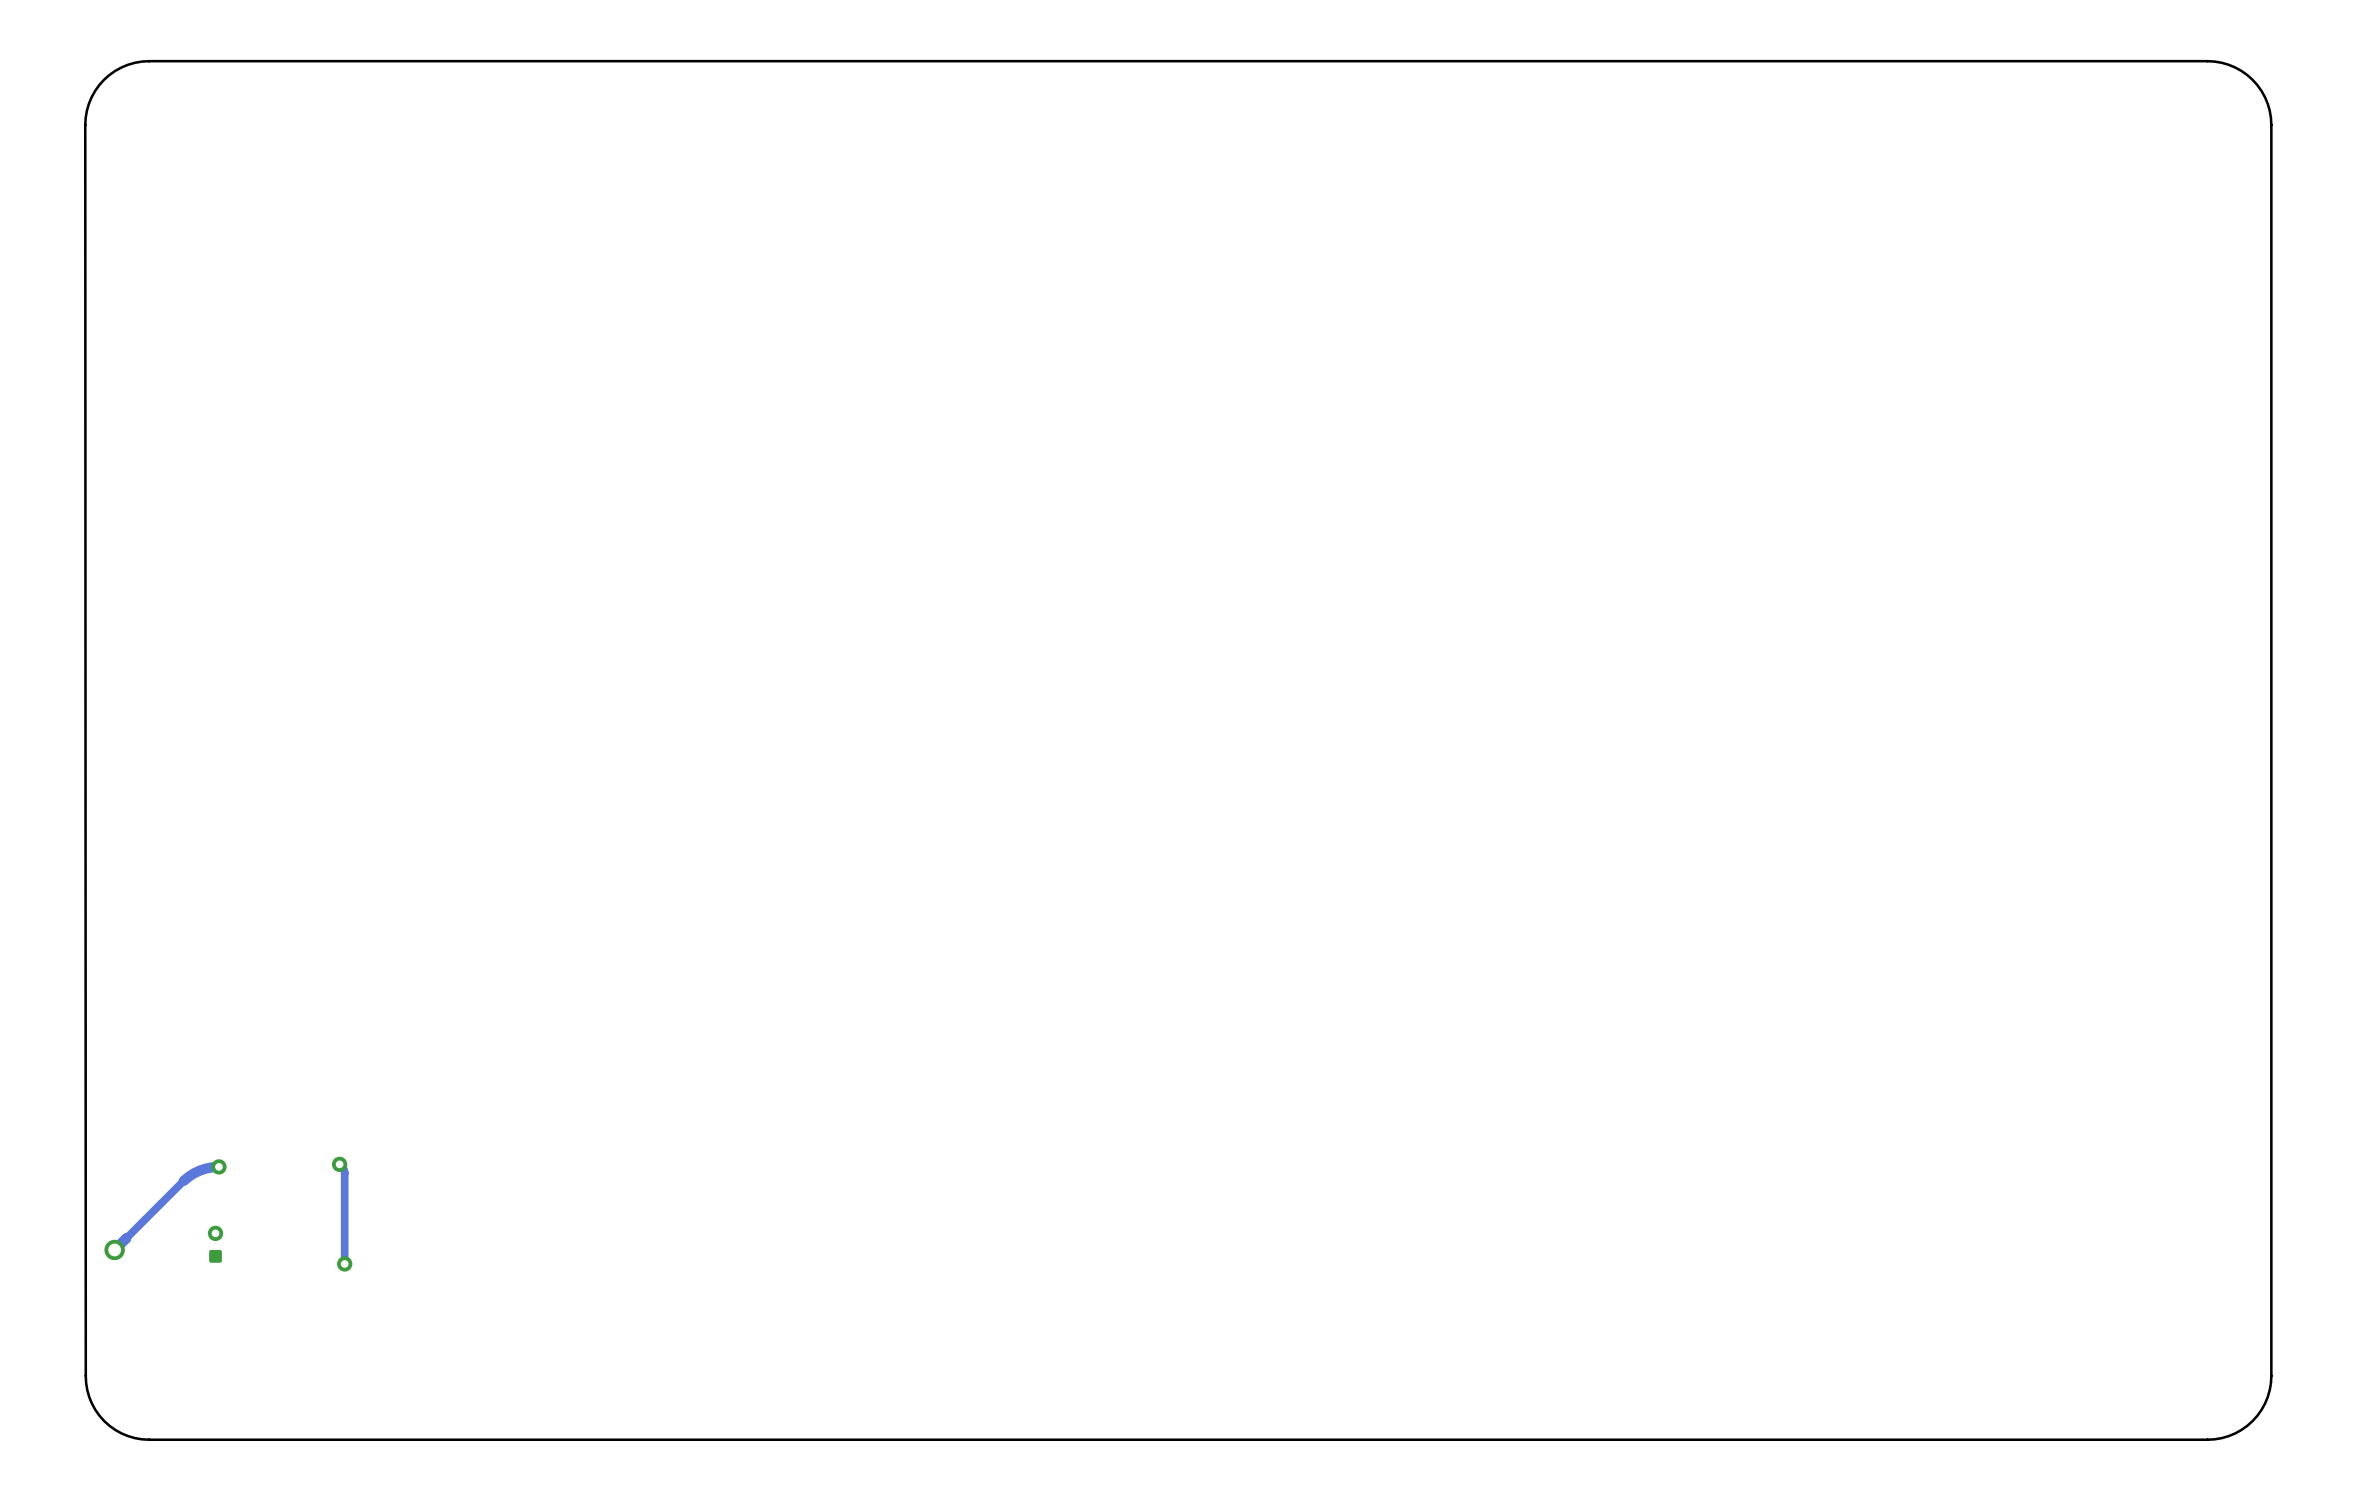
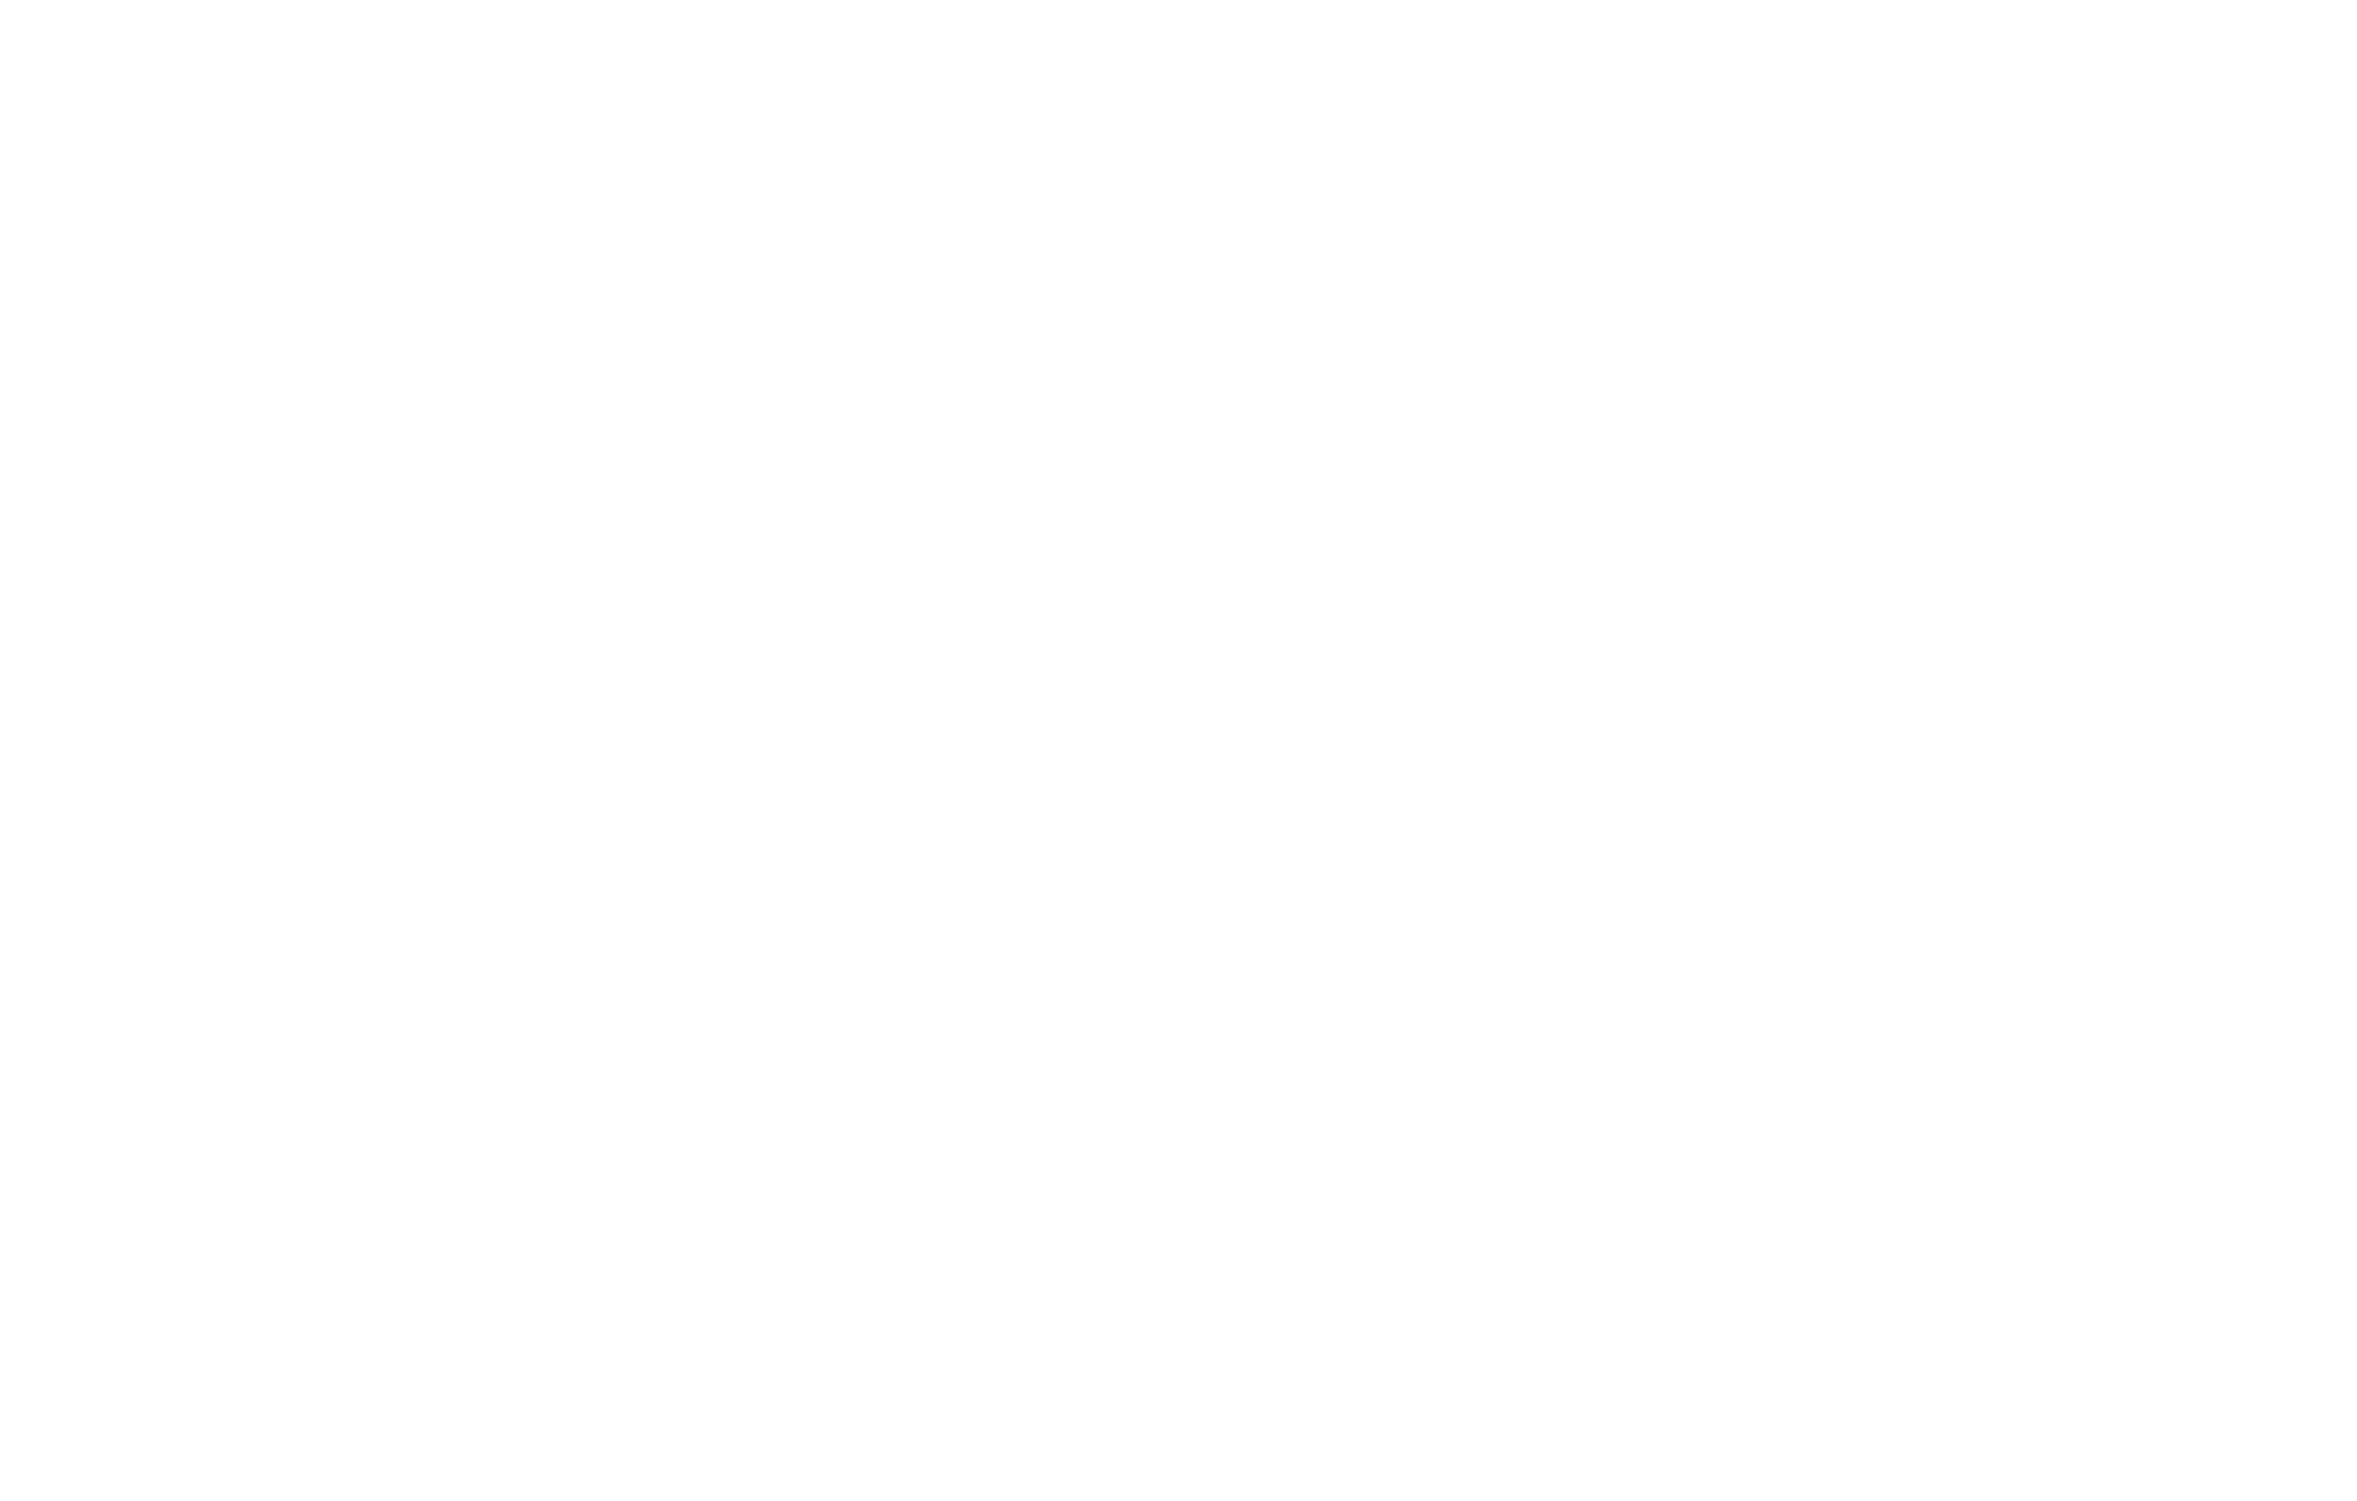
board edge: (2207, 61) (149, 61) (134, 62) (115, 70) (103, 79) (95, 91) (88, 103) (85, 125) (85, 1375) (87, 1390) (95, 1409) (109, 1425) (121, 1433) (134, 1438) (149, 1439) (2207, 1439) (2228, 1436) (2241, 1429) (2252, 1421) (2261, 1409) (2267, 1396) (2271, 1375) (2271, 125) (2267, 103) (2261, 91) (2252, 79) (2241, 70) (2228, 64) (2207, 61) -> none
via: (339, 1164) -> none
track: (218, 1166) (200, 1170) (188, 1176) (114, 1249) -> none
via: (218, 1166) -> none
track: (339, 1166) (339, 1164) (344, 1173) (344, 1263) -> none
part: (215, 1244) -> none
via: (114, 1249) -> none
via: (344, 1263) -> none

